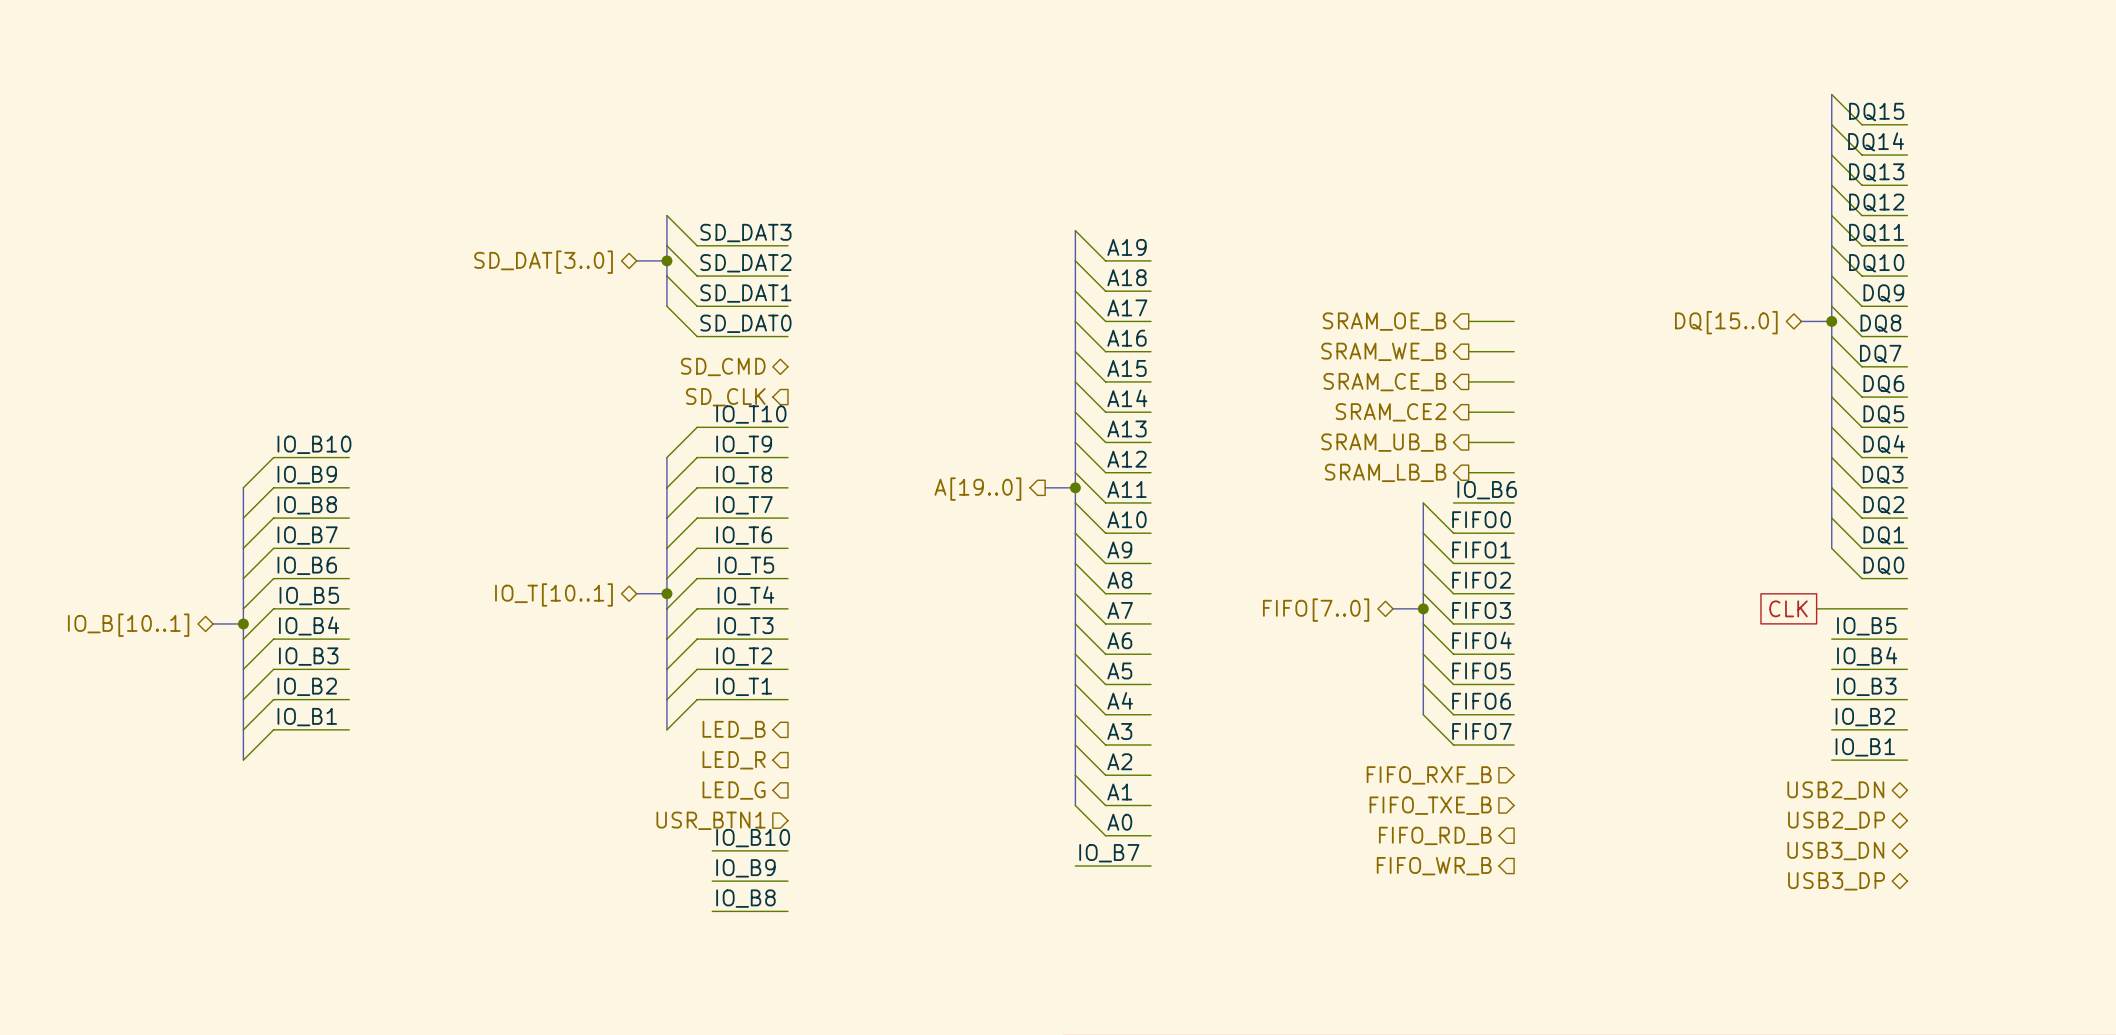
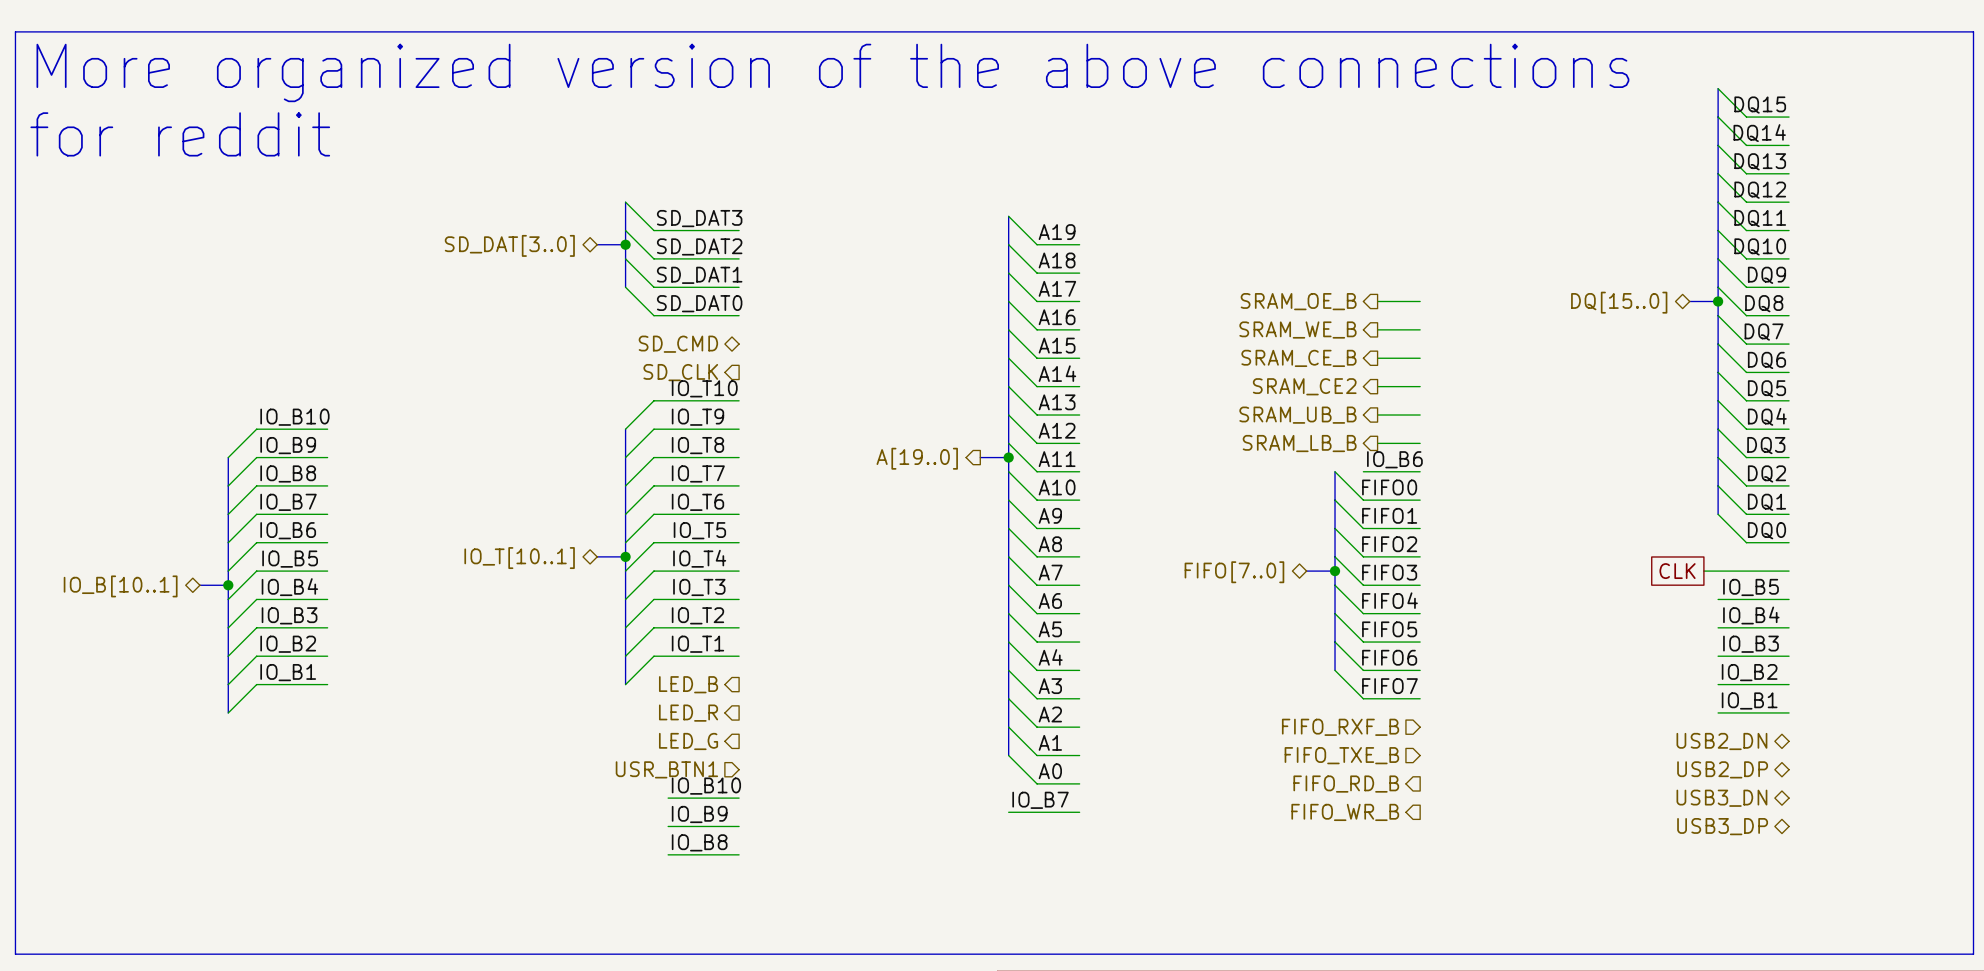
line: none -> (15, 31) (1973, 31) (1973, 954) (15, 954) (15, 31)
text: none -> More organized version of the above connections (832, 72)
text: none -> for reddit (180, 134)

